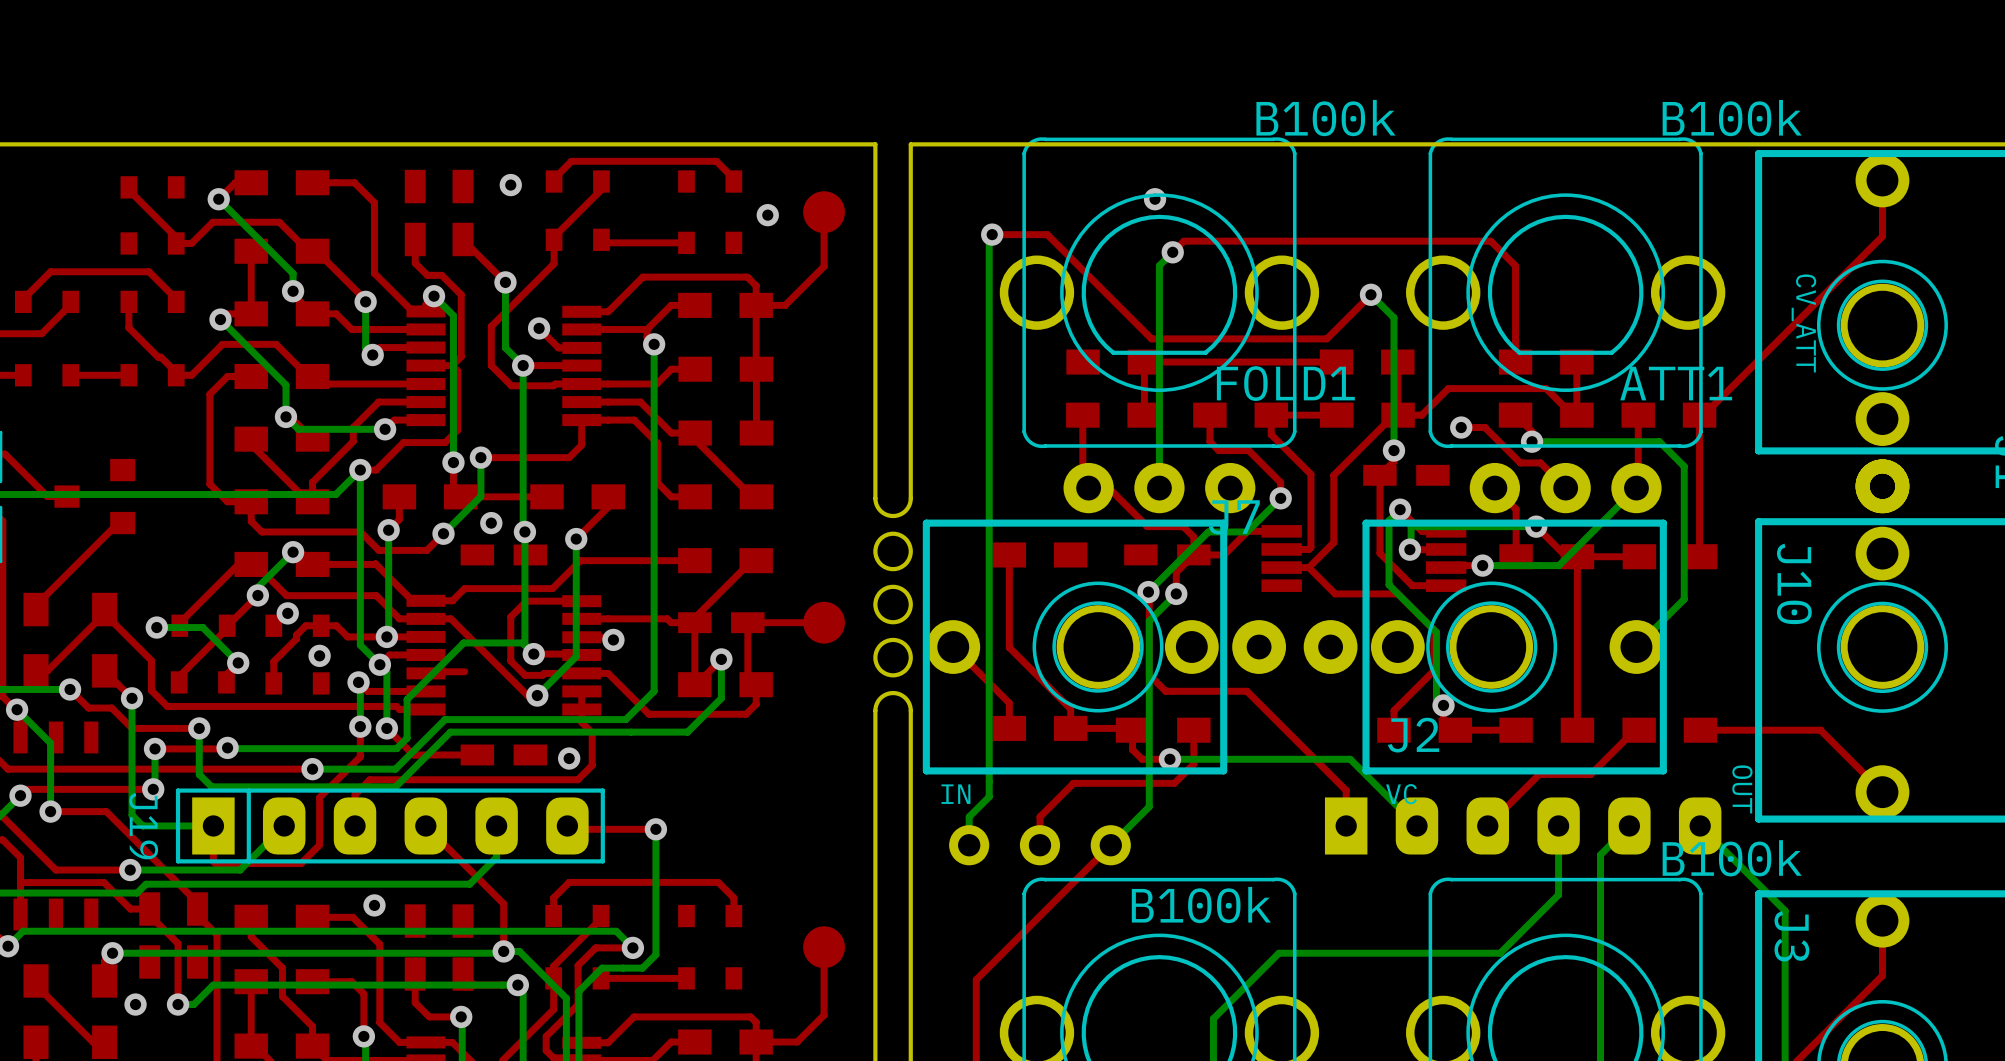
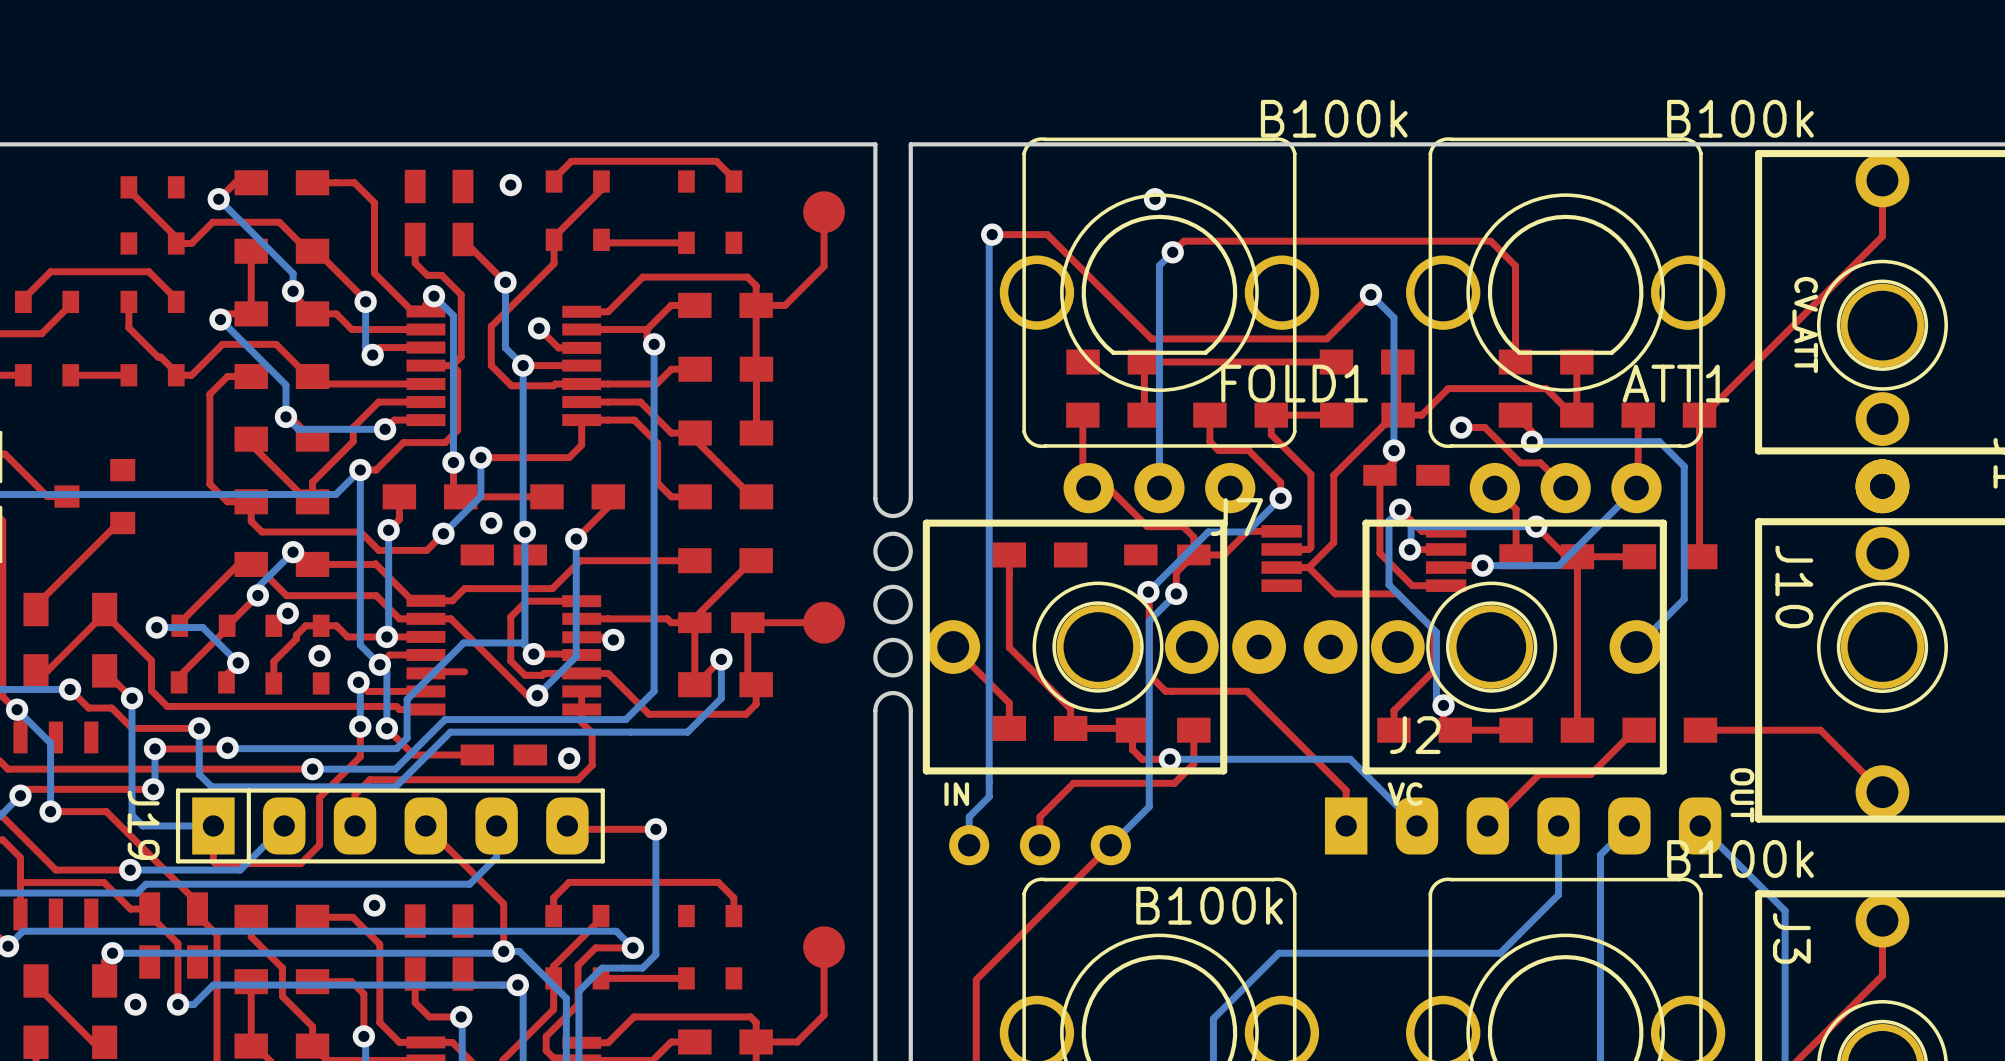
via: (767, 215) -> none

